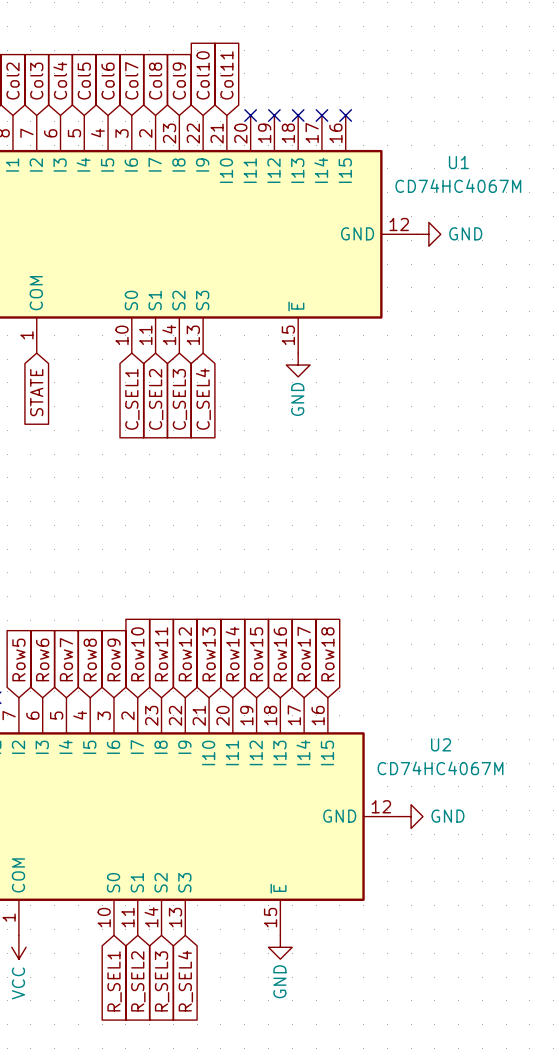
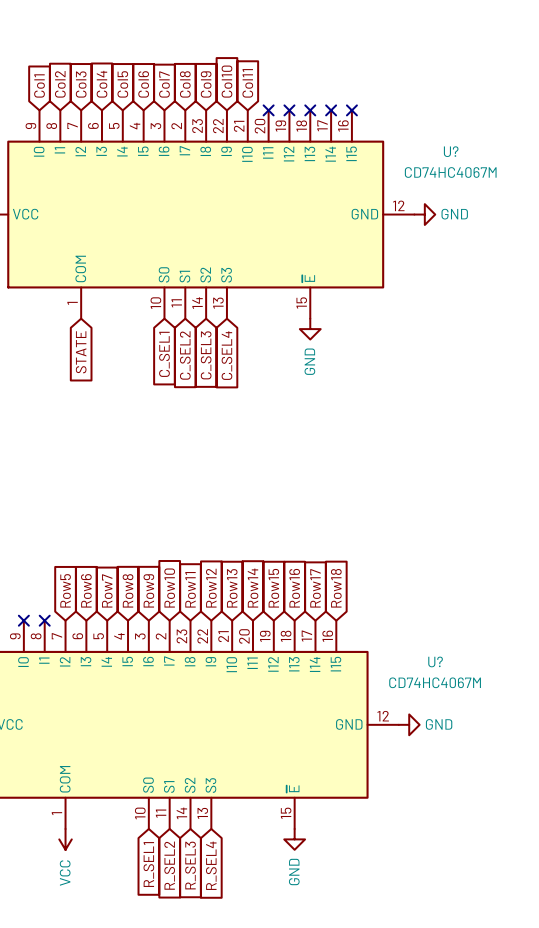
U1 name: U1 (458, 162) -> U? (451, 151)
U2 name: U2 (441, 744) -> U? (435, 661)

